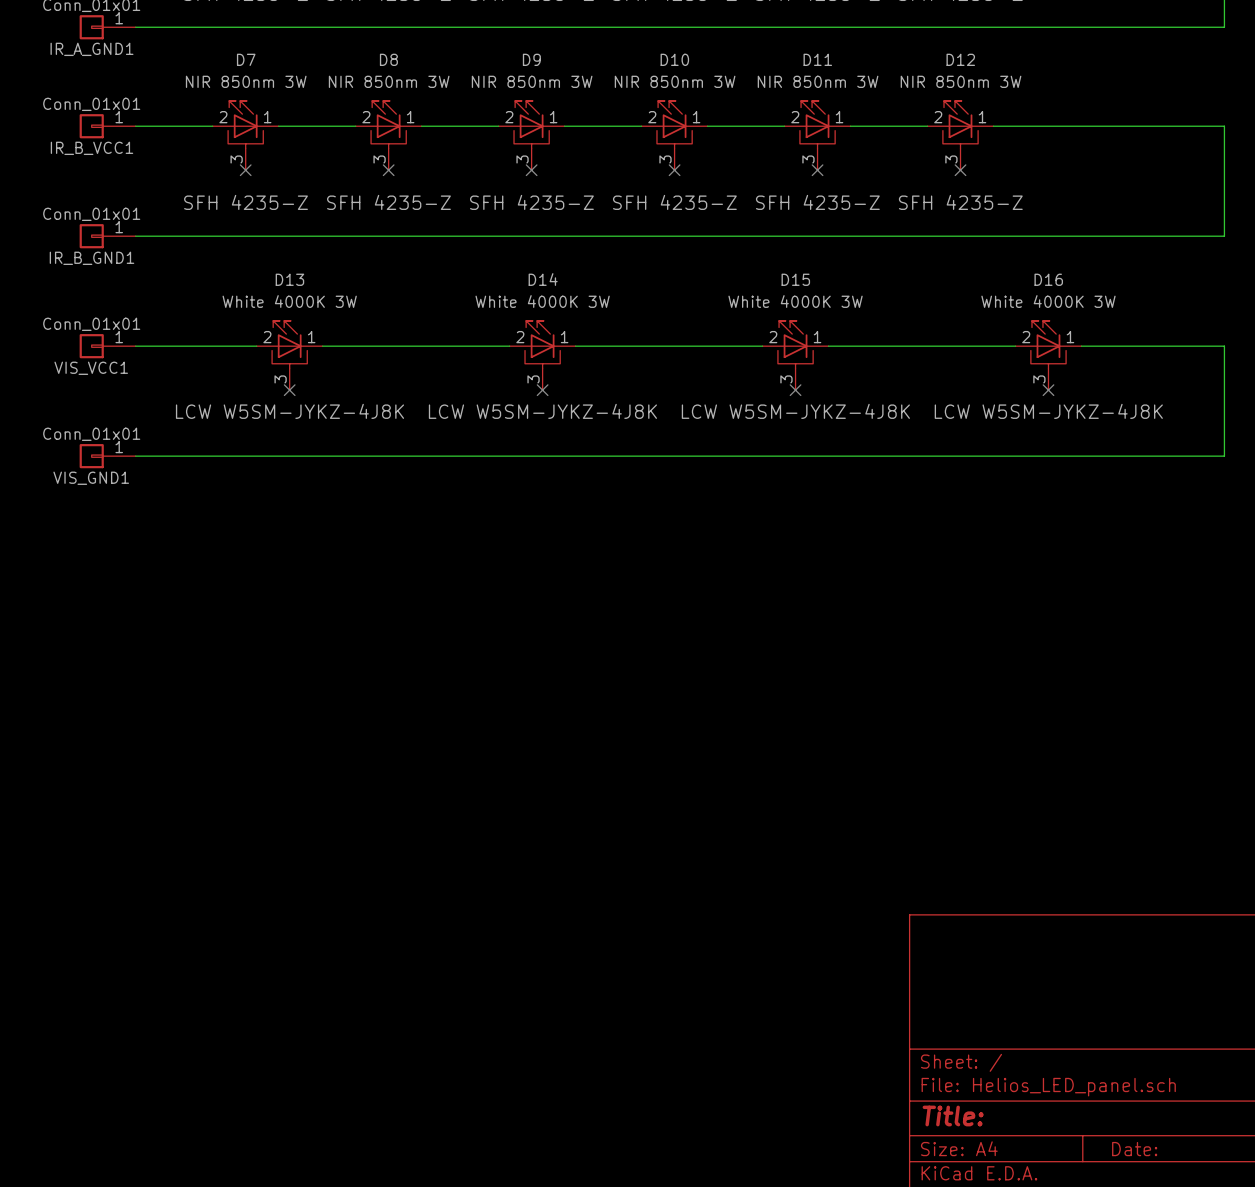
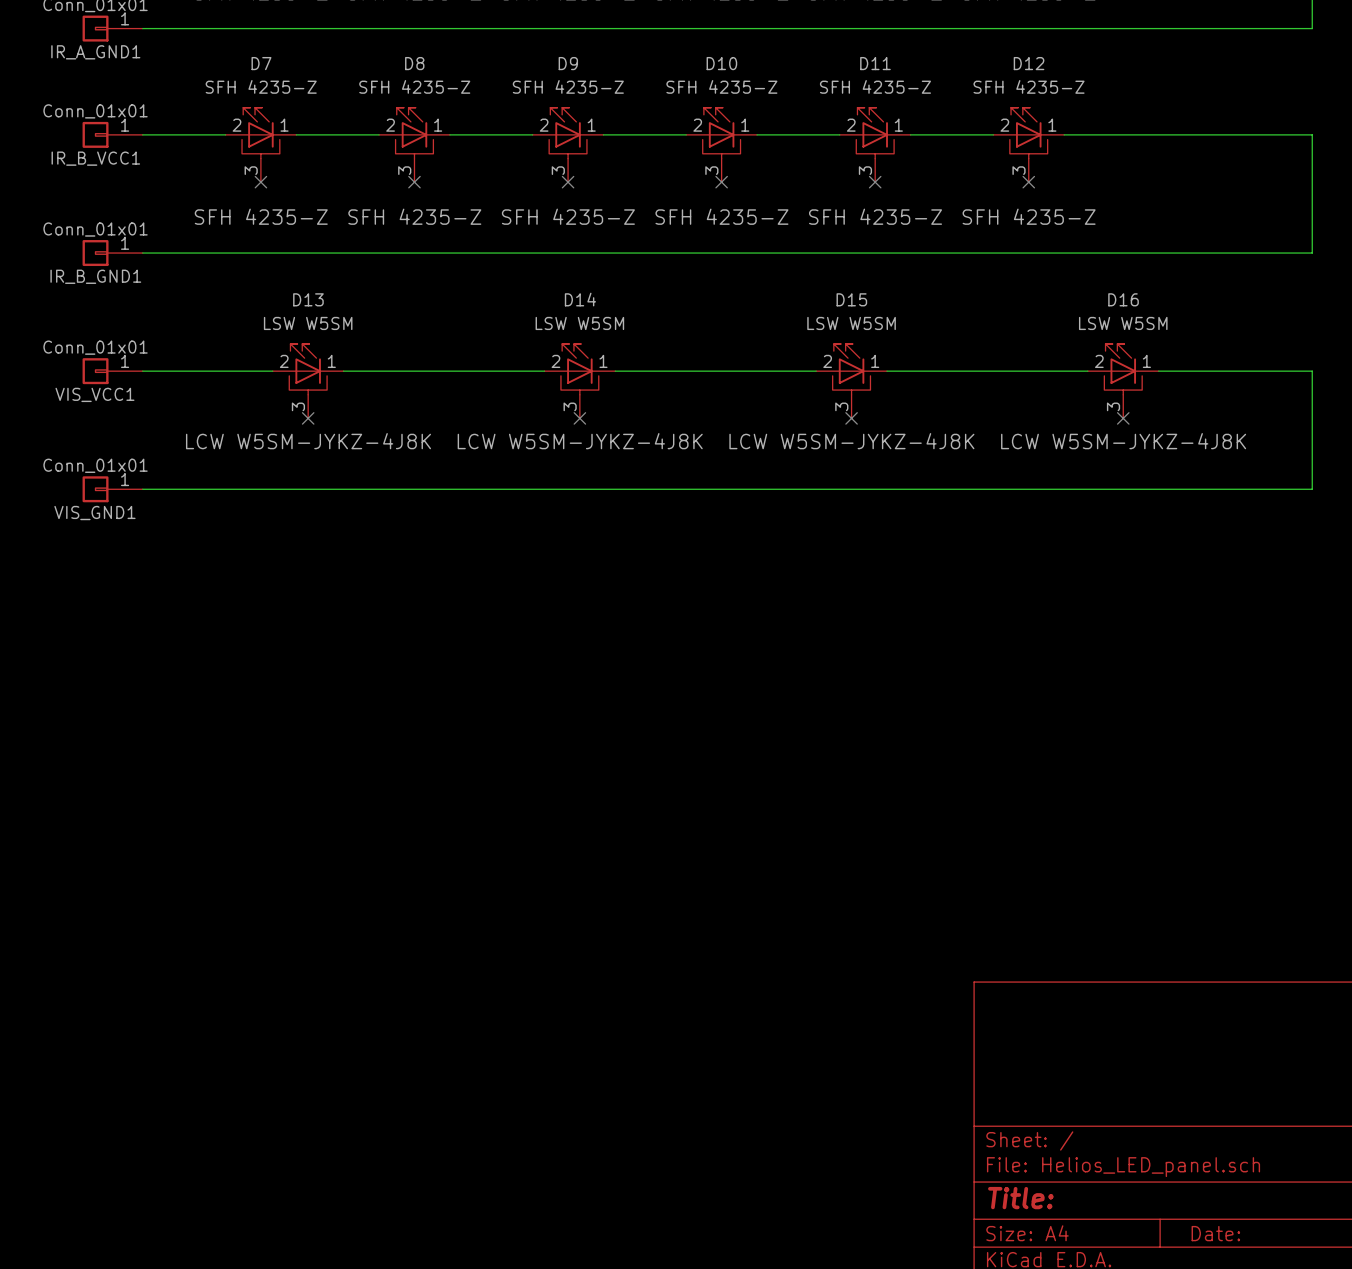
D7 value: NIR 850nm 3W (246, 81) -> SFH 4235-Z (261, 86)
D8 value: NIR 850nm 3W (389, 81) -> SFH 4235-Z (414, 86)
D9 value: NIR 850nm 3W (532, 81) -> SFH 4235-Z (568, 86)
D10 value: NIR 850nm 3W (675, 81) -> SFH 4235-Z (721, 86)
D11 value: NIR 850nm 3W (818, 81) -> SFH 4235-Z (875, 86)
D12 value: NIR 850nm 3W (961, 81) -> SFH 4235-Z (1029, 86)
D13 value: White 4000K 3W (289, 301) -> LSW W5SM (308, 323)
D14 value: White 4000K 3W (542, 301) -> LSW W5SM (579, 323)
D15 value: White 4000K 3W (795, 301) -> LSW W5SM (851, 323)
D16 value: White 4000K 3W (1048, 301) -> LSW W5SM (1123, 323)

